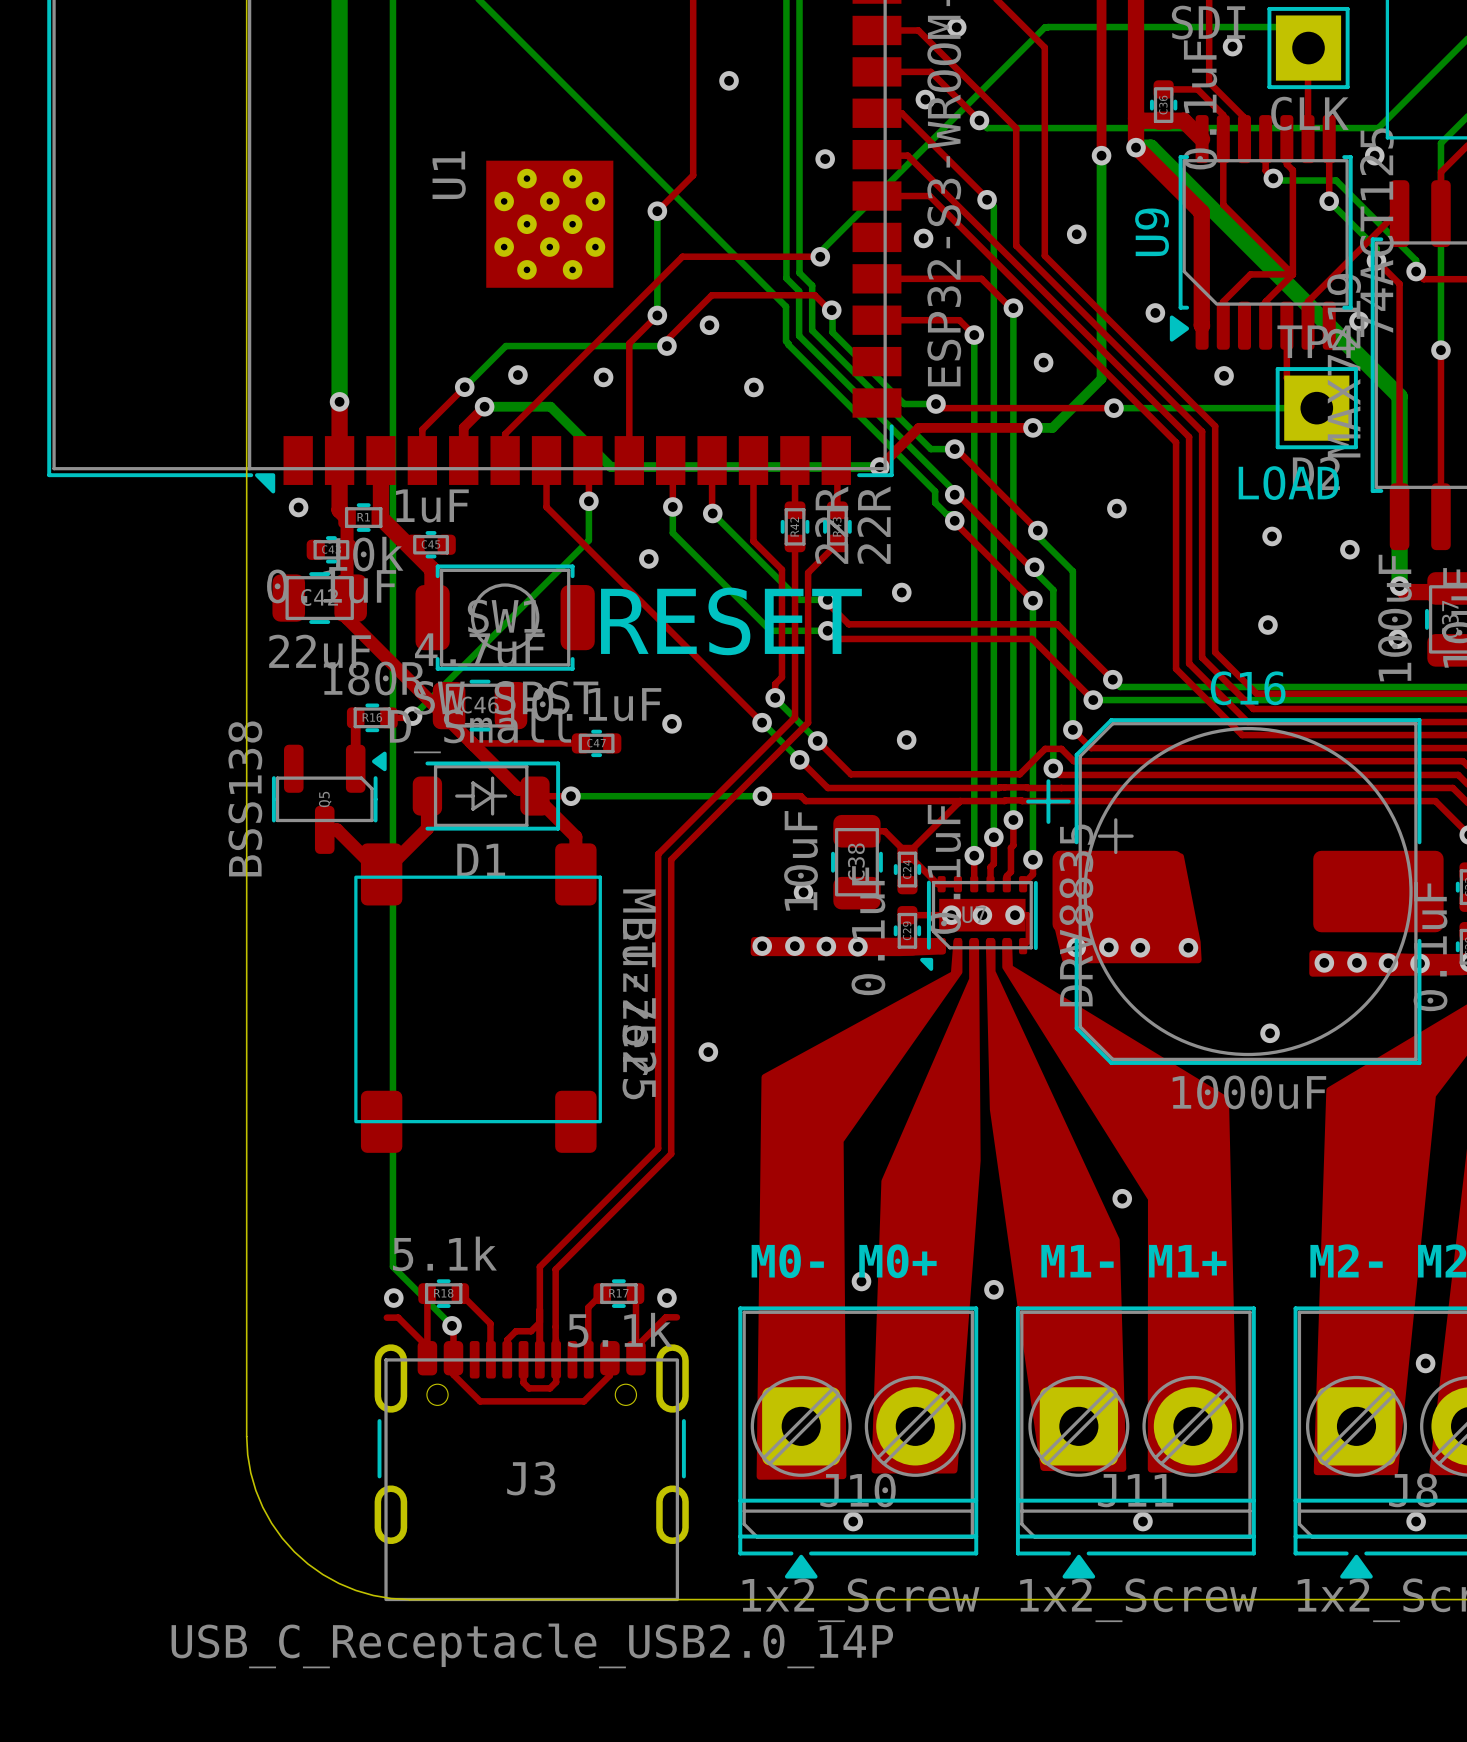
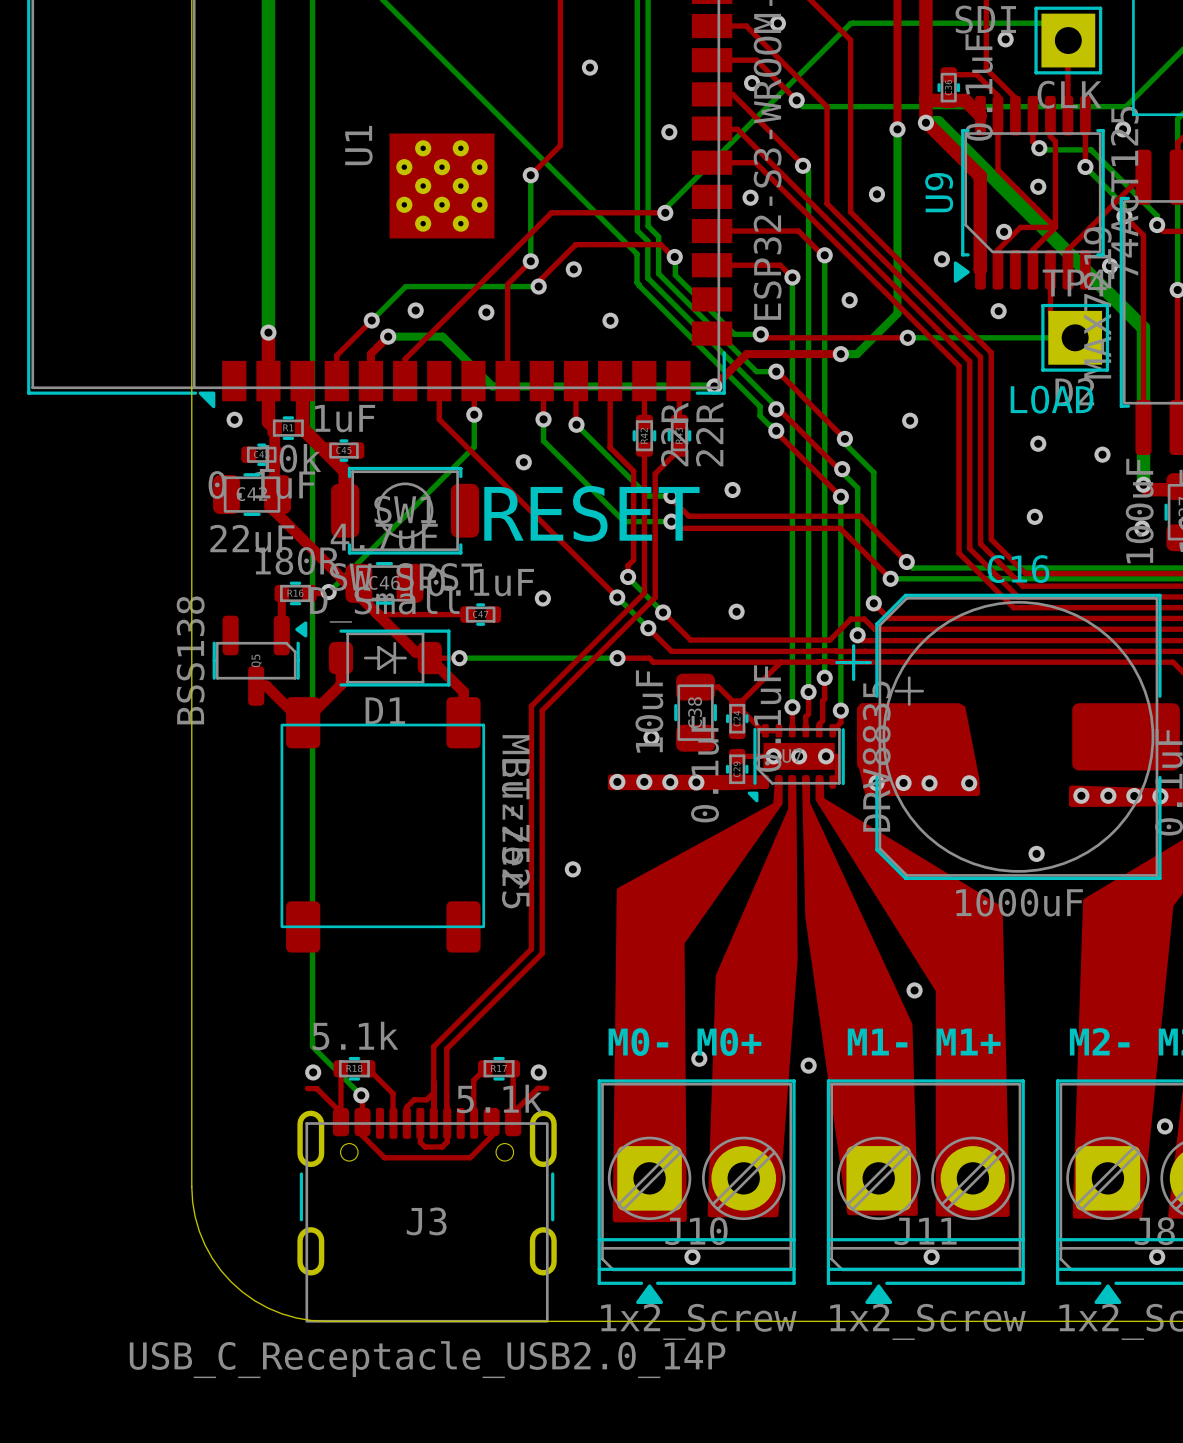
via: none -> (1038, 186)
via: none -> (1004, 231)

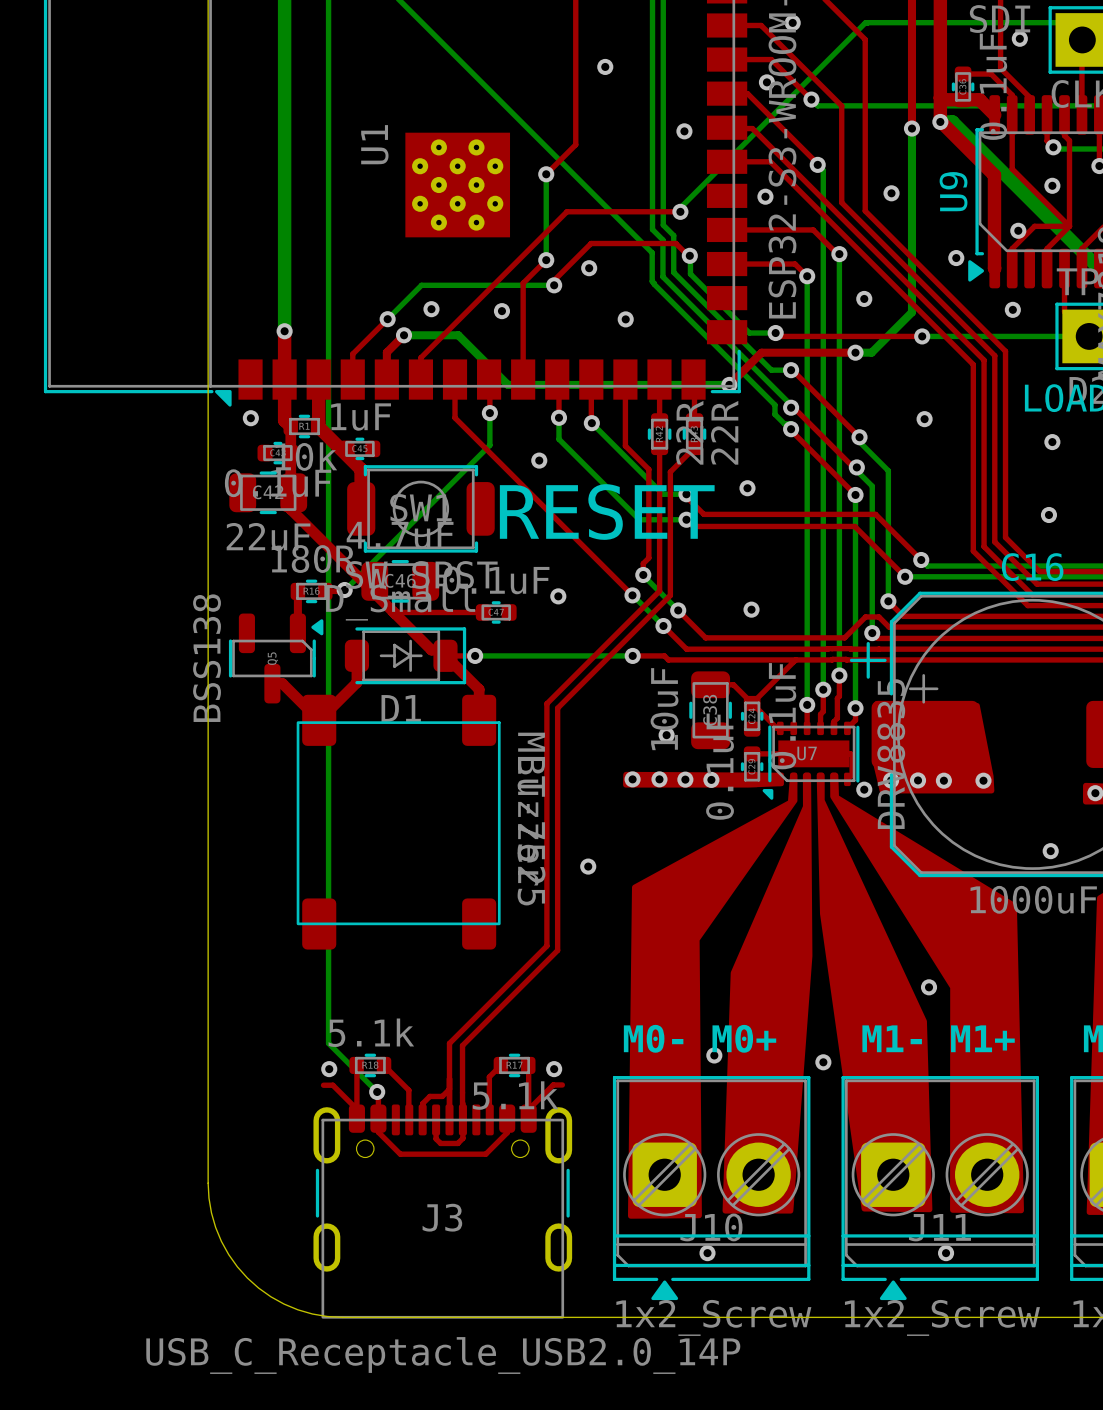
via: (773, 756) -> none
via: (799, 756) -> none
via: (826, 756) -> none
via: none -> (864, 789)

